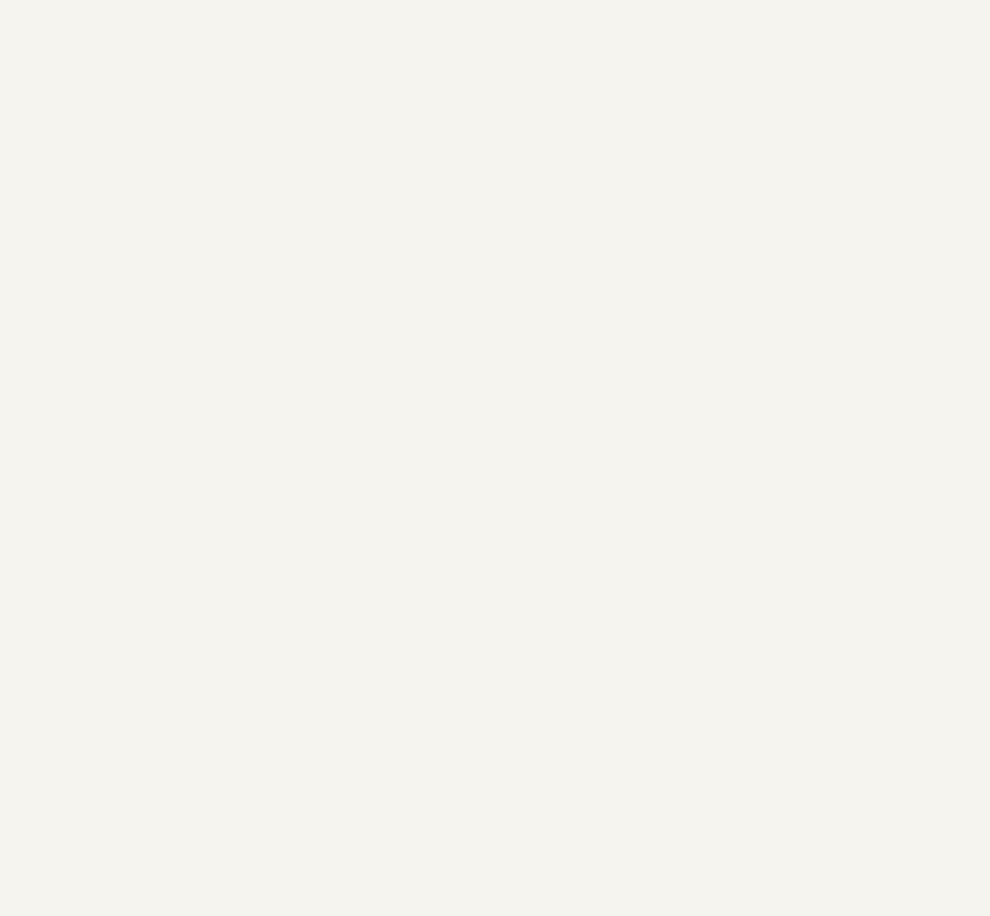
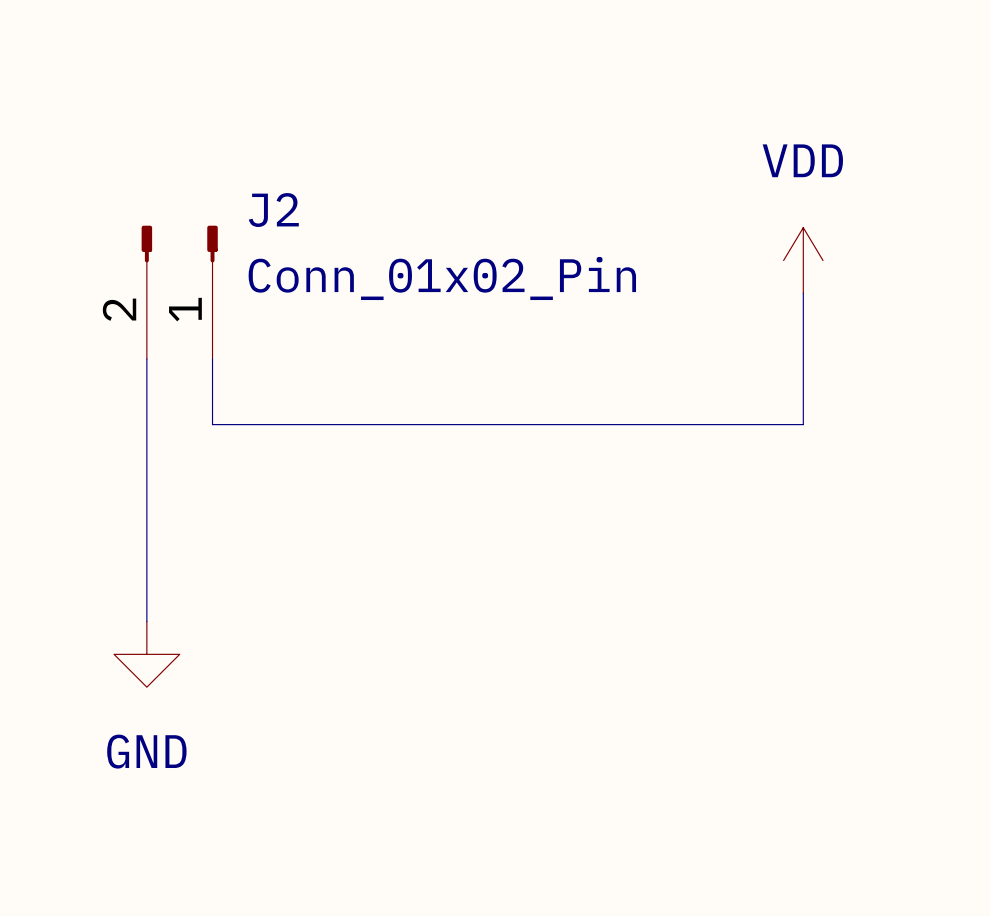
power symbol: none -> VDD (803, 260)
J2: none -> Conn_01x02_Pin (179, 292)
wire: none -> (803, 293) (803, 424) (212, 424) (212, 358)
wire: none -> (146, 358) (146, 621)
power symbol: none -> GND (146, 654)

